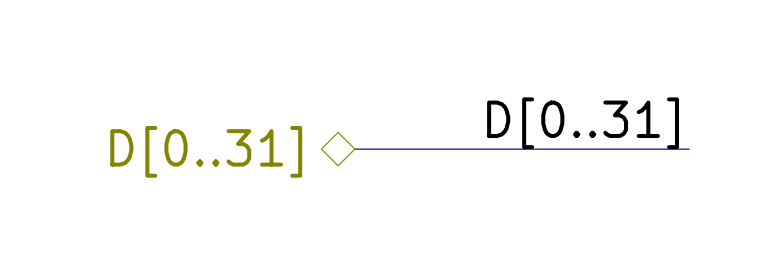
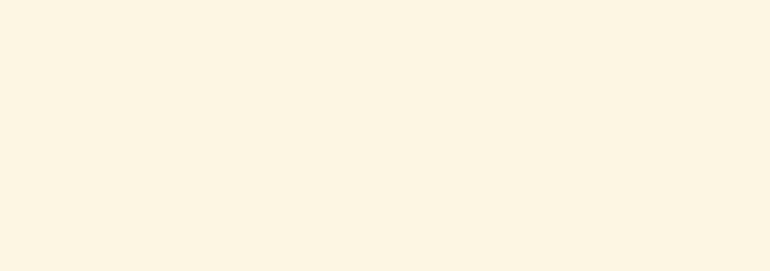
label: D[0..31] (583, 123) -> none
bus: (354, 149) (689, 149) -> none
hierarchical label: D[0..31] (206, 151) -> none

